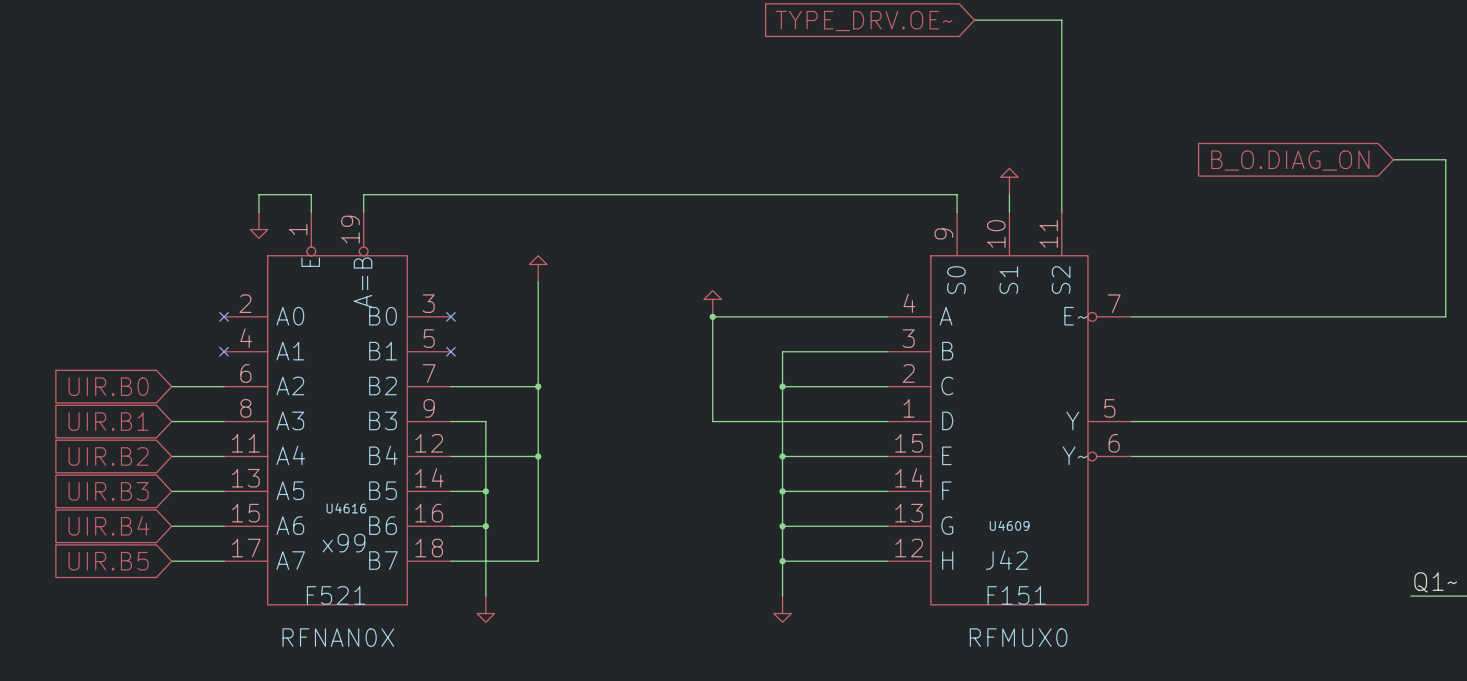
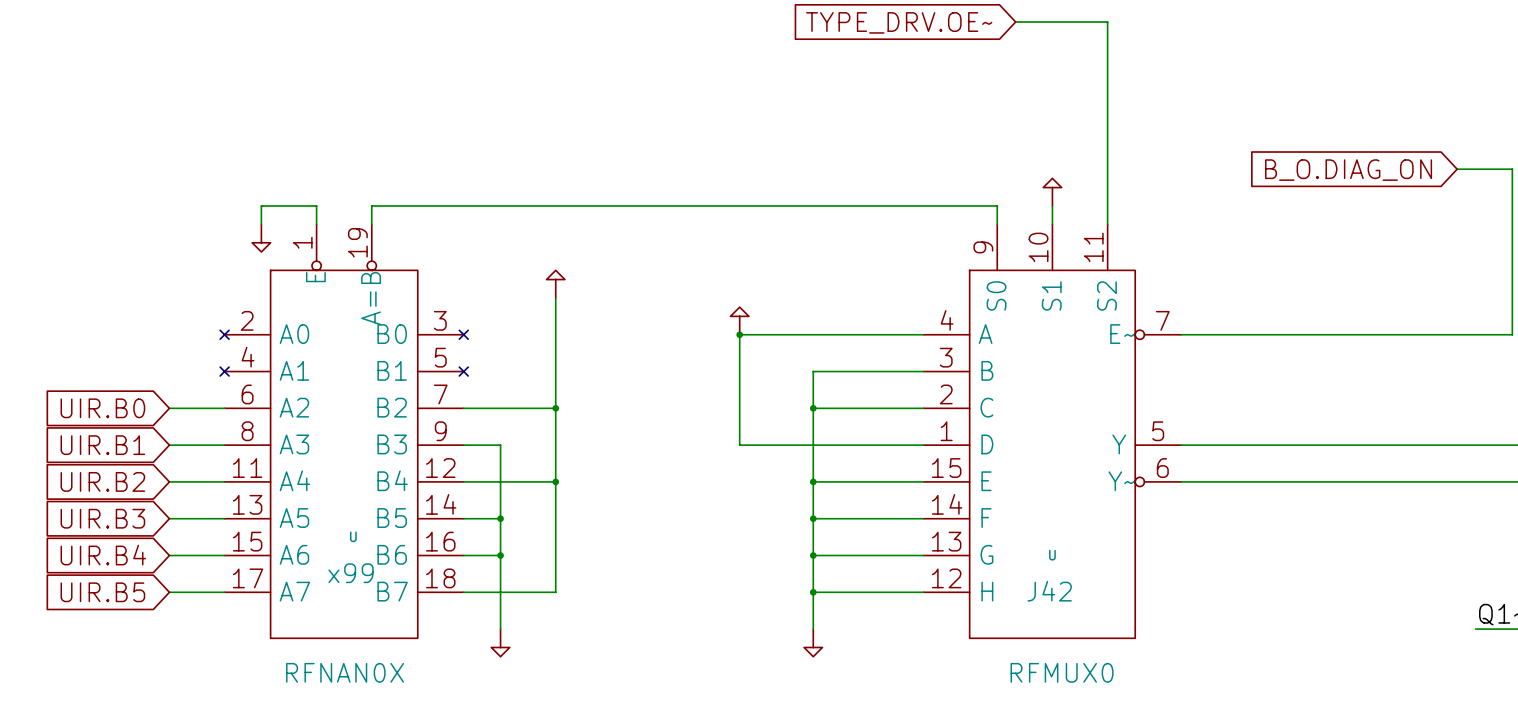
U4616 name: U4616 (346, 508) -> U (353, 536)
U4609 name: U4609 (1009, 525) -> U (1052, 555)
U4616 value: F521 (336, 595) -> none
U4609 value: F151 (1016, 595) -> none

